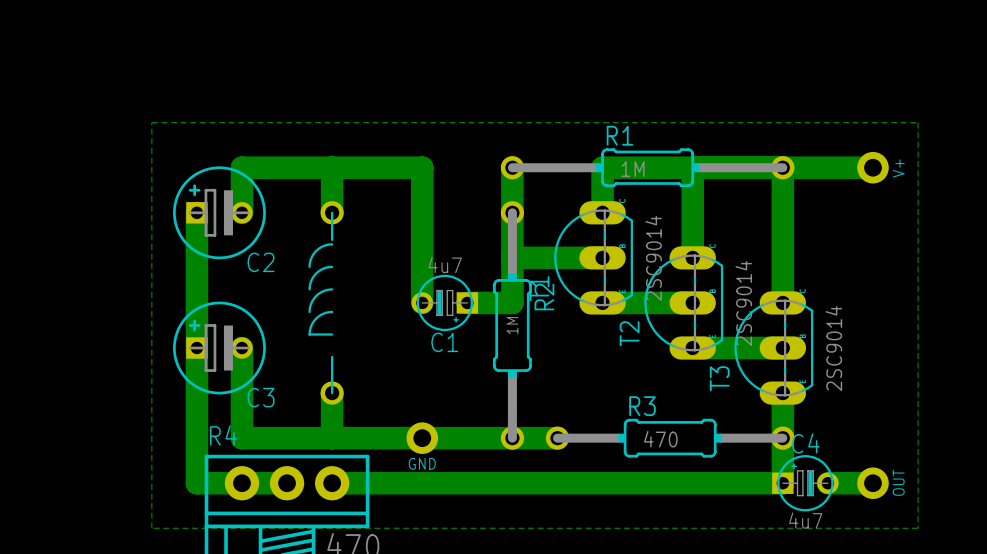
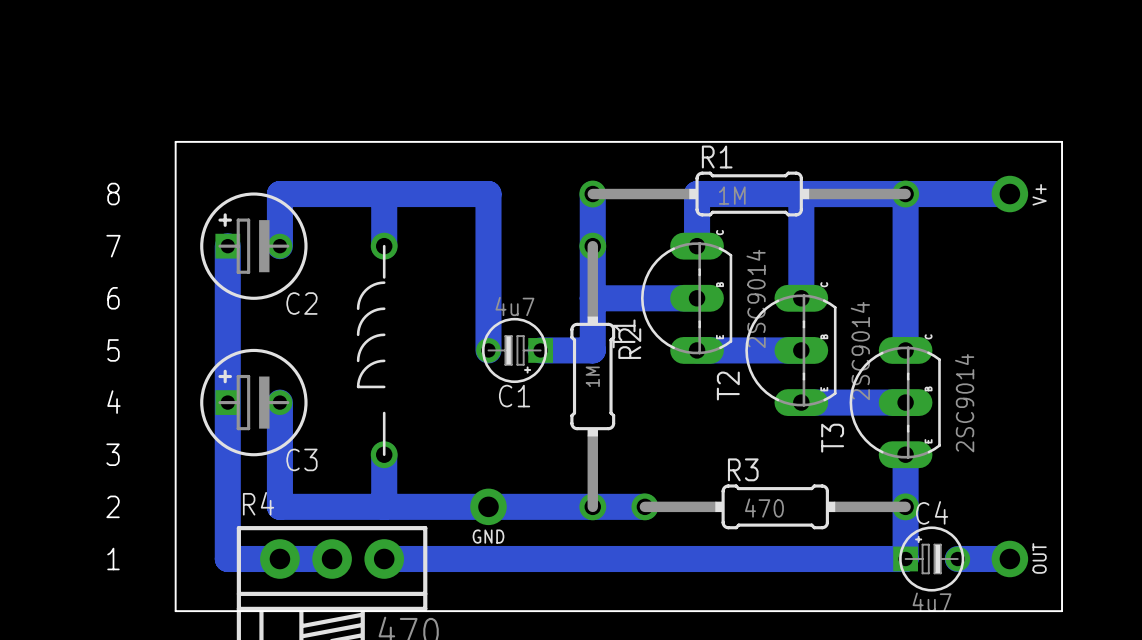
bottom zone outline: (151, 122) (918, 122) (918, 528) (151, 528) (151, 122) -> none
board edge: none -> (175, 141) (1062, 141) (1062, 611) (175, 611) (175, 141)
text: none -> 8 (113, 194)
text: none -> 7 (113, 246)
text: none -> 6 (113, 298)
text: none -> 5 (113, 350)
text: none -> 4 (113, 402)
text: none -> 3 (113, 454)
text: none -> 2 (113, 506)
text: none -> 1 (113, 559)

